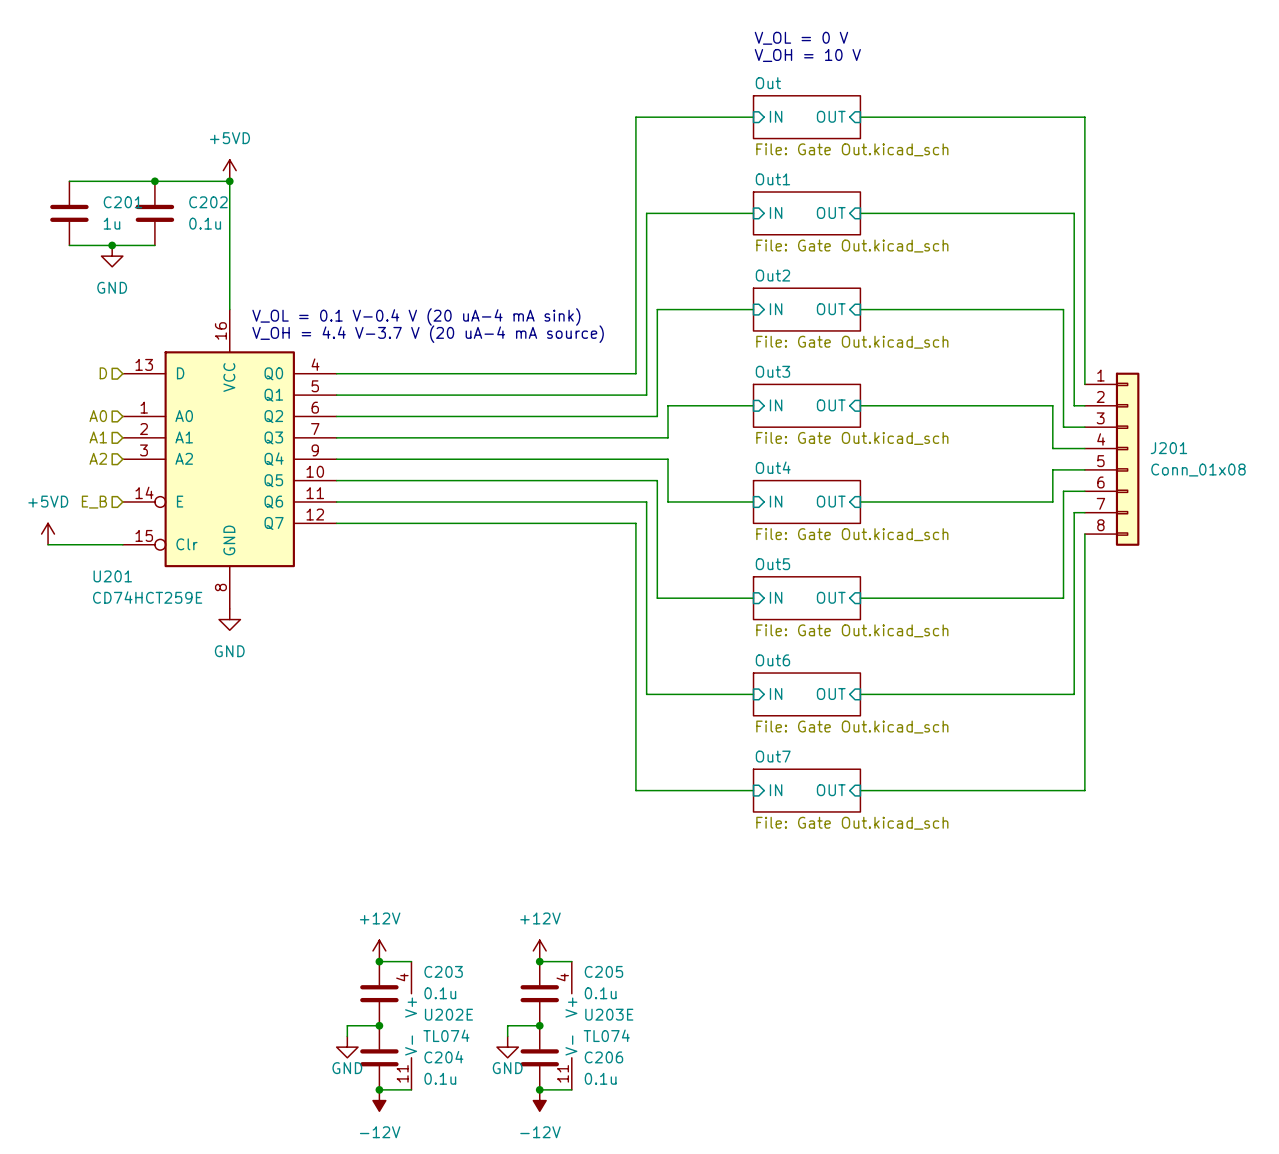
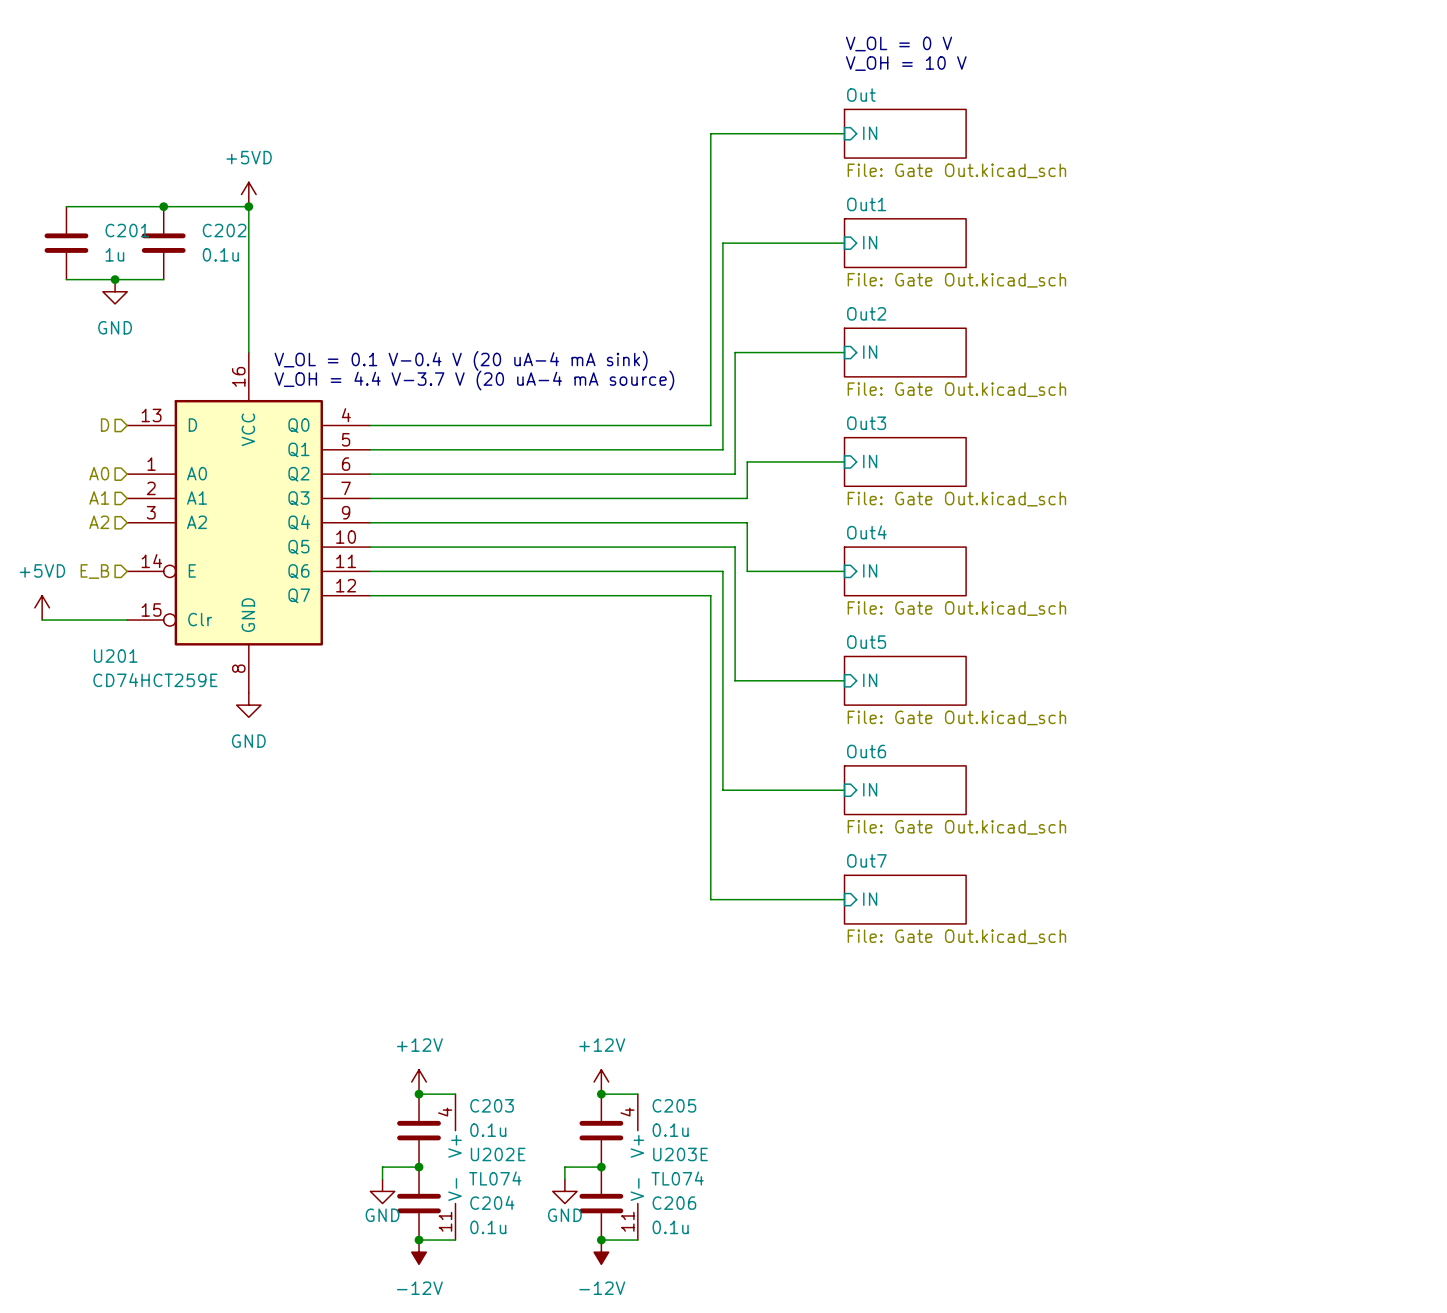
sheet pin: OUT (831, 116) -> none
wire: (860, 117) (1084, 117) (1084, 384) -> none
sheet pin: OUT (831, 212) -> none
wire: (860, 213) (1074, 213) (1074, 405) (1084, 405) -> none
sheet pin: OUT (831, 309) -> none
wire: (860, 309) (1063, 309) (1063, 427) (1084, 427) -> none
sheet pin: OUT (831, 405) -> none
wire: (860, 405) (1052, 405) (1052, 448) (1084, 448) -> none
J201: Conn_01x08 (1112, 459) -> none
wire: (1084, 469) (1052, 469) (1052, 501) (860, 501) -> none
wire: (1084, 491) (1063, 491) (1063, 598) (860, 598) -> none
sheet pin: OUT (831, 501) -> none
wire: (1084, 512) (1074, 512) (1074, 694) (860, 694) -> none
wire: (1084, 534) (1084, 790) (860, 790) -> none
sheet pin: OUT (831, 597) -> none
sheet pin: OUT (831, 693) -> none
sheet pin: OUT (831, 790) -> none

